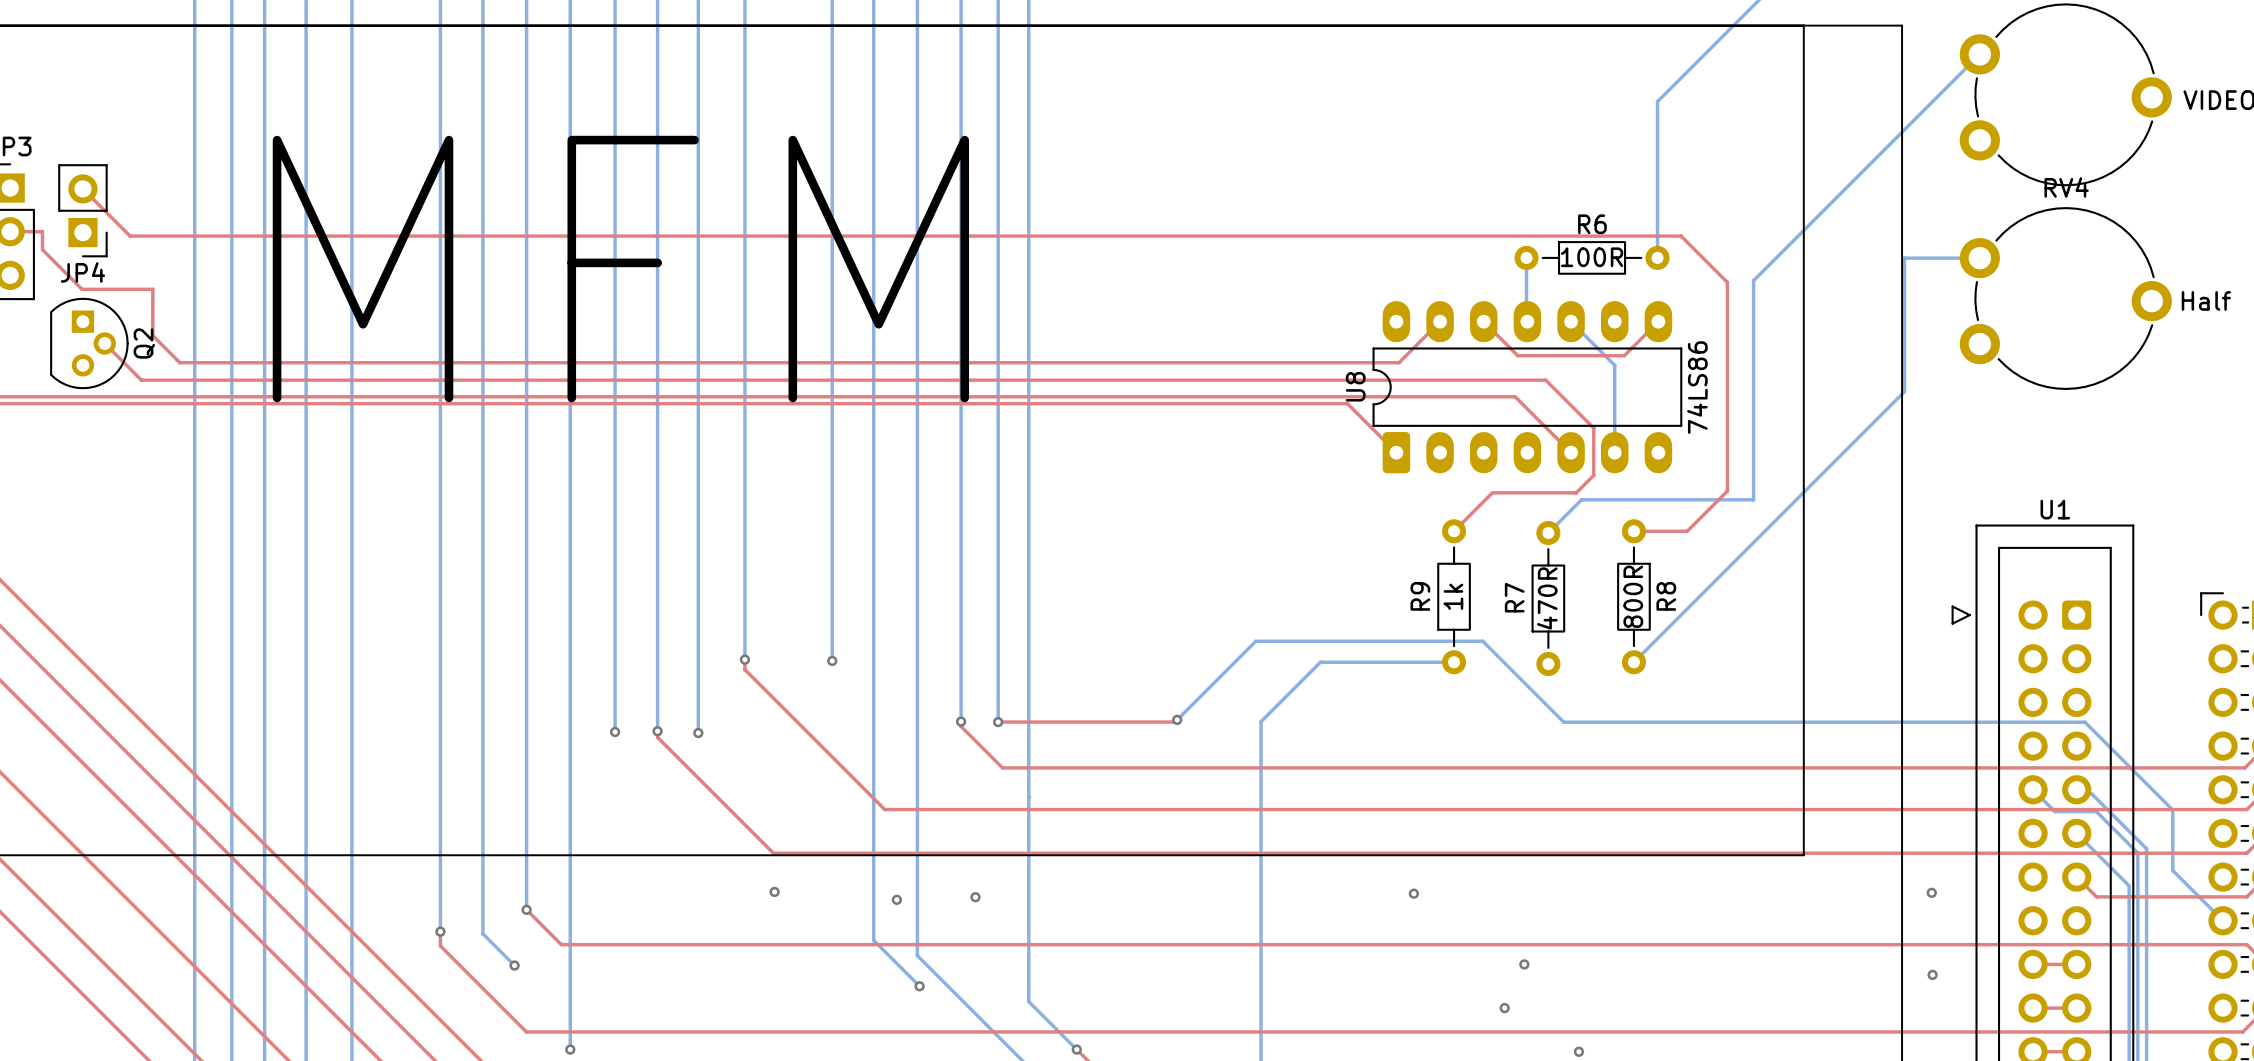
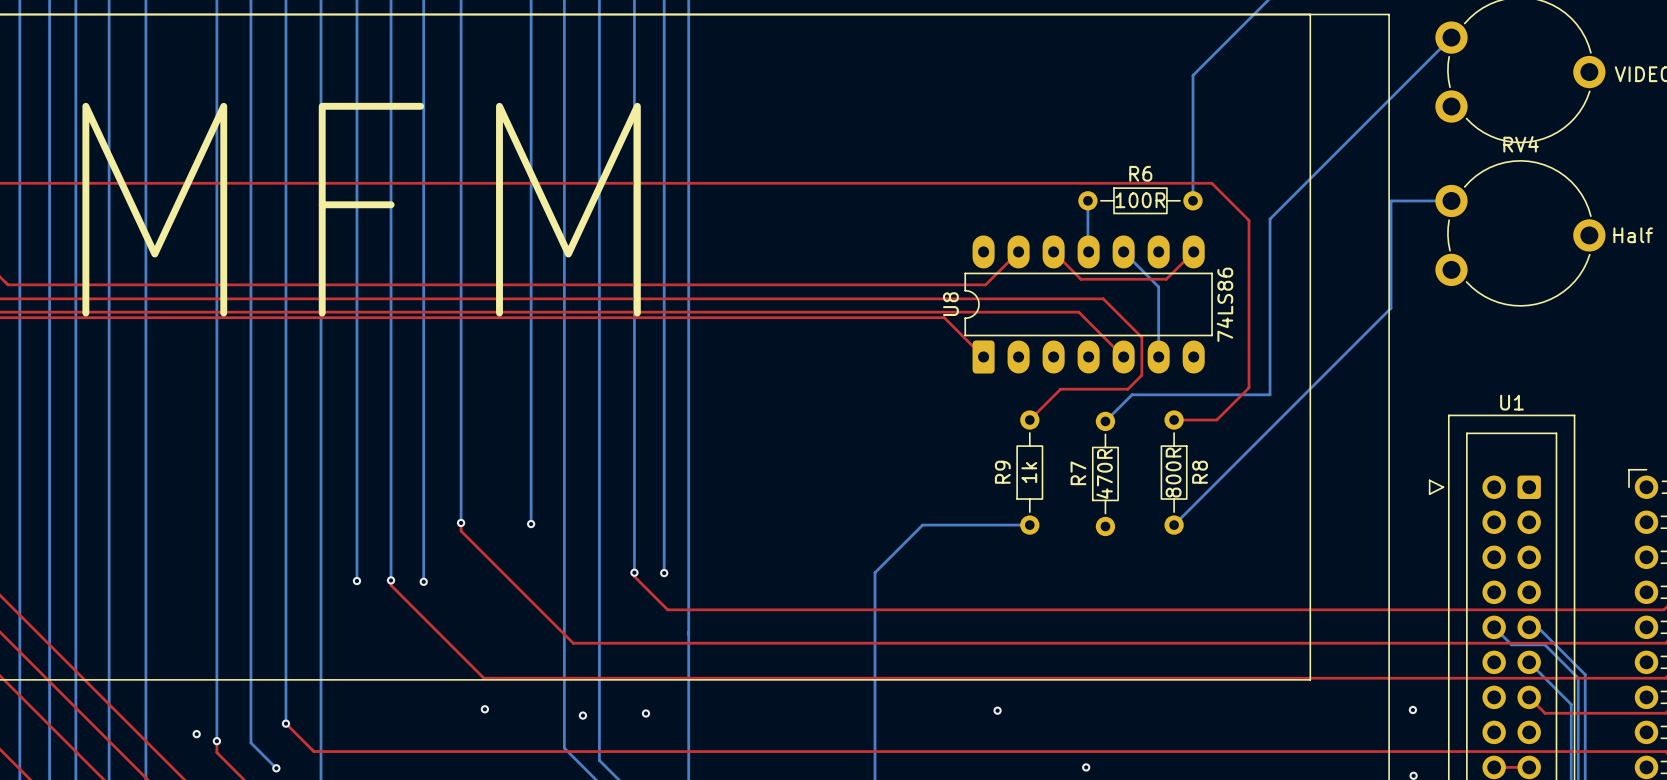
top track: (1177, 719) (1175, 722) (998, 722) -> none
bottom track: (1177, 719) (1255, 641) (1482, 641) (1563, 722) (2084, 722) (2172, 810) (2172, 870) (2223, 920) -> none
via: (1177, 719) -> none
via: none -> (196, 734)

